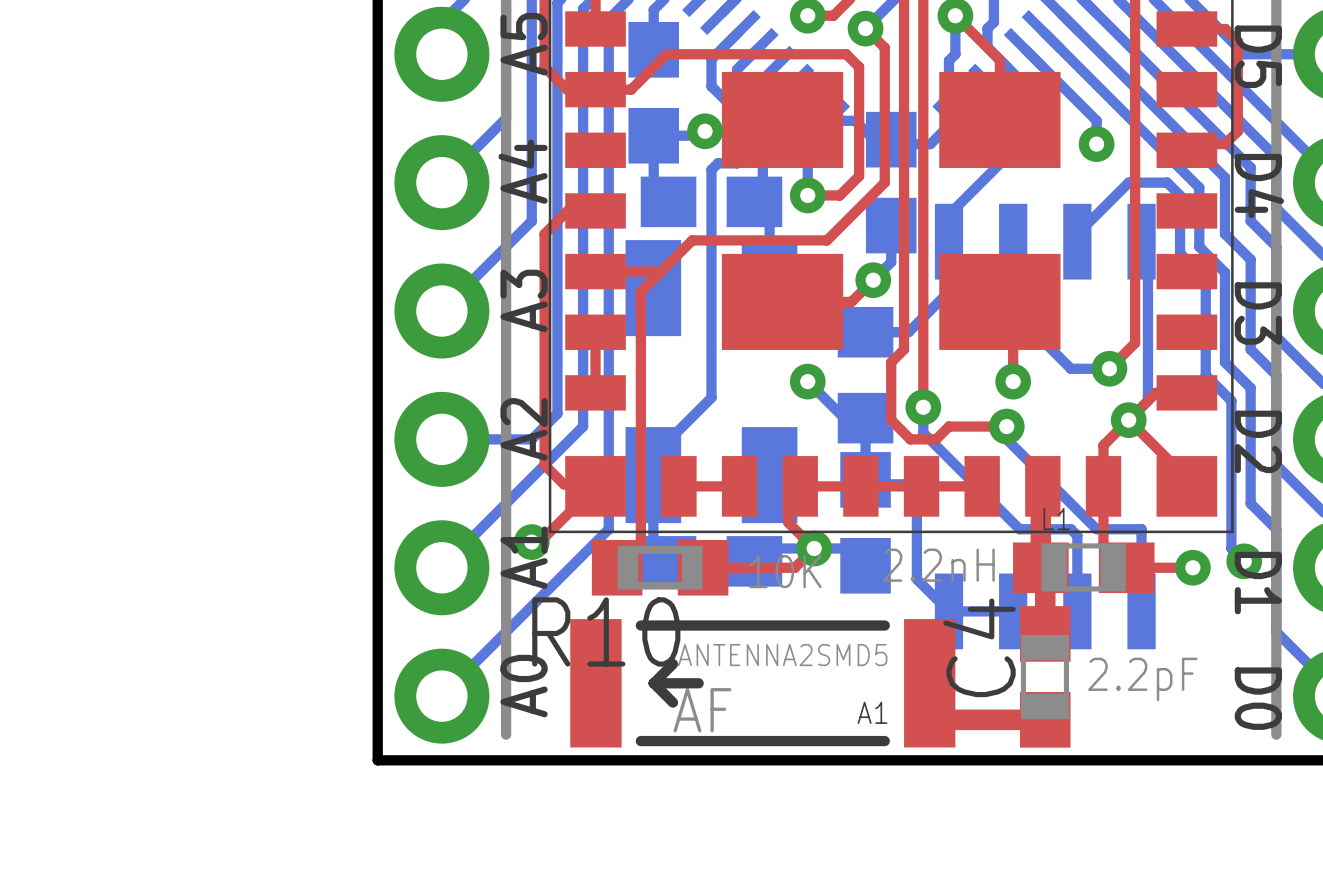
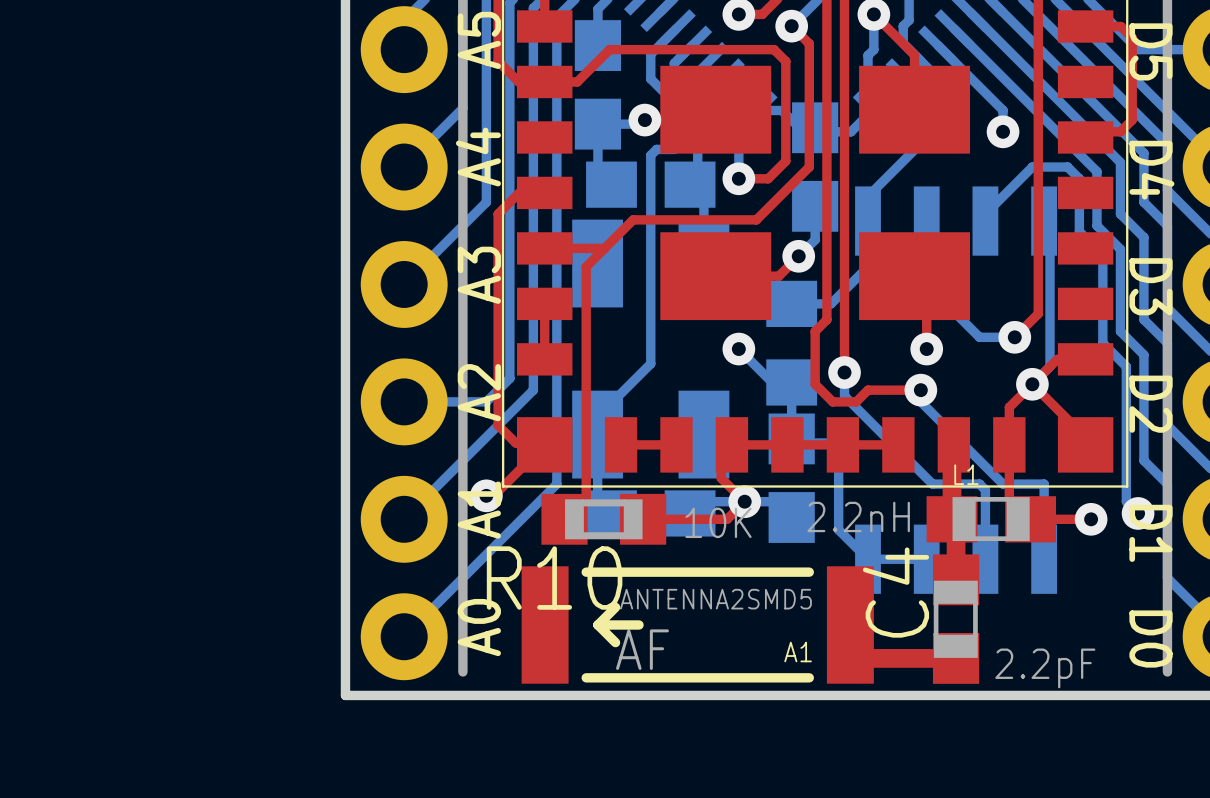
C4 value position: 2.2pF (1142, 679) -> 2.2pF (1045, 668)

